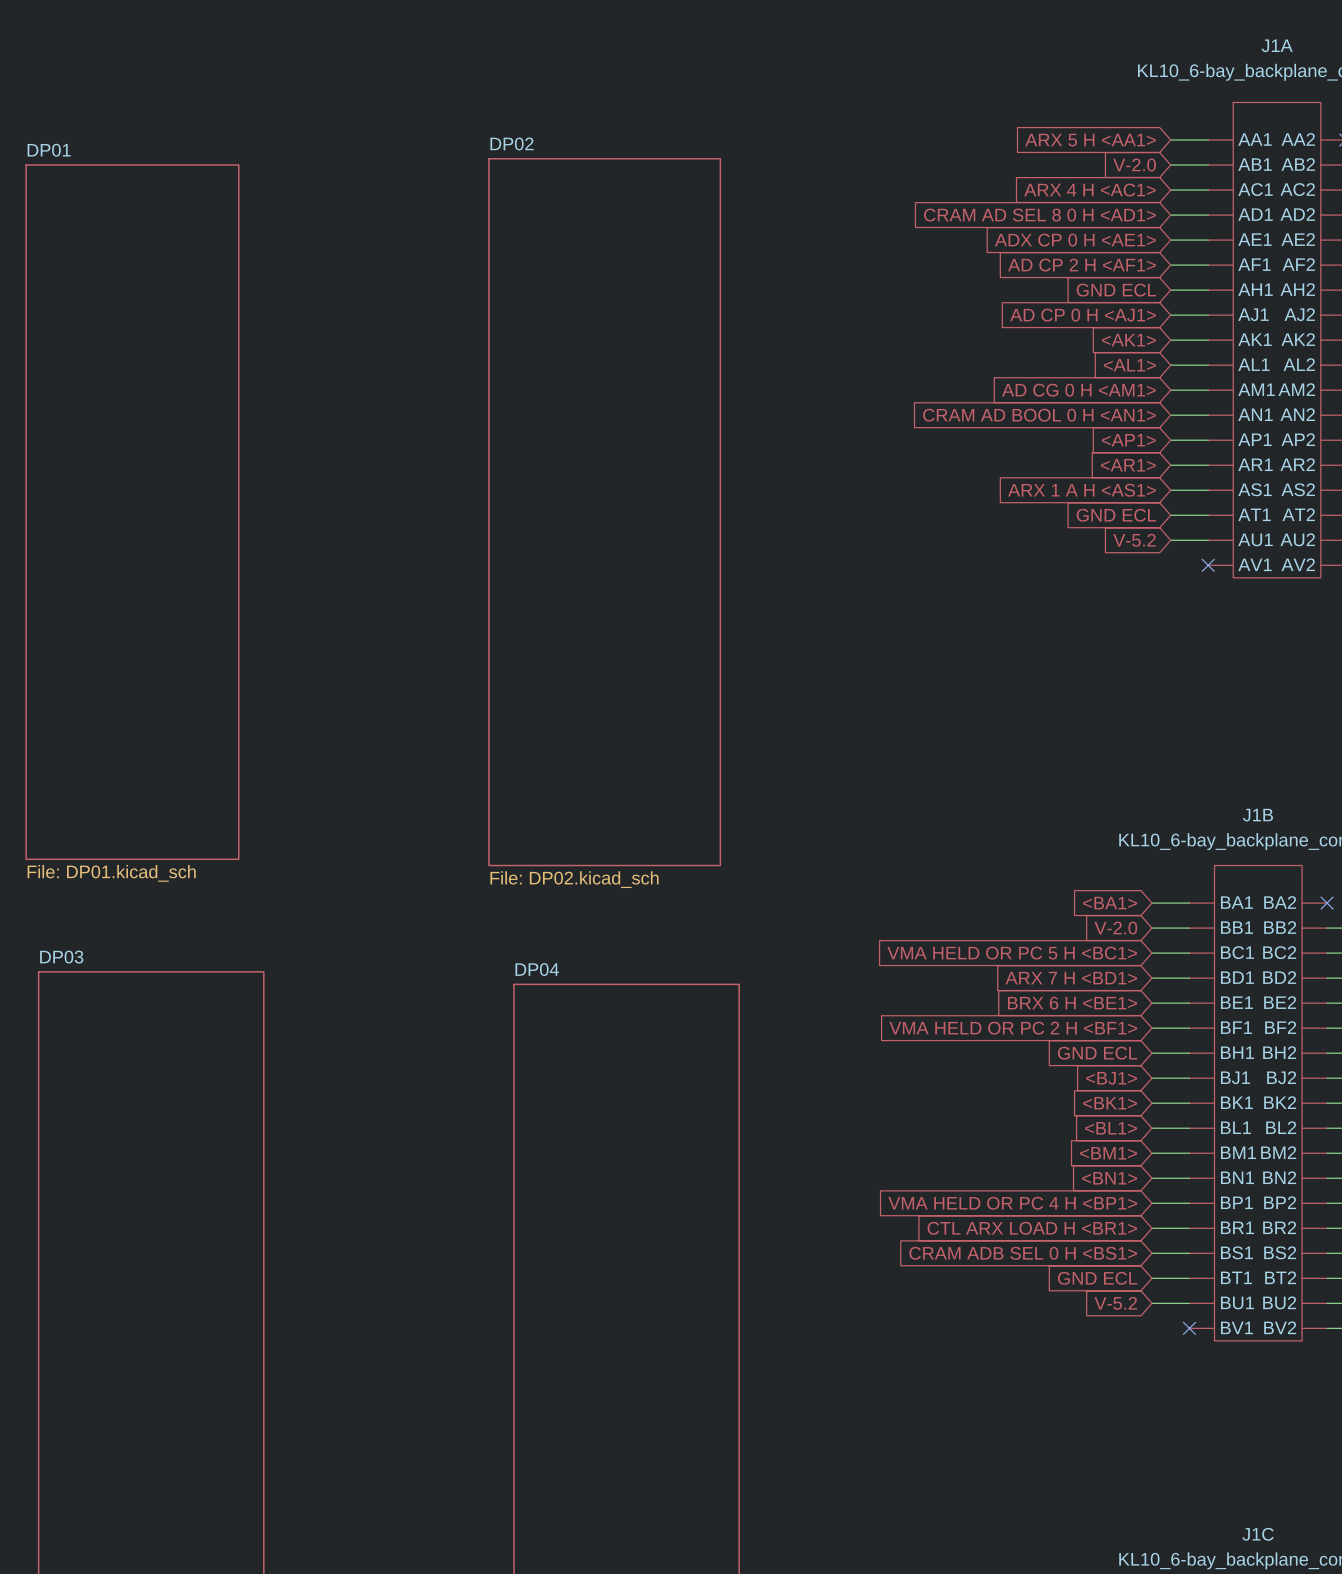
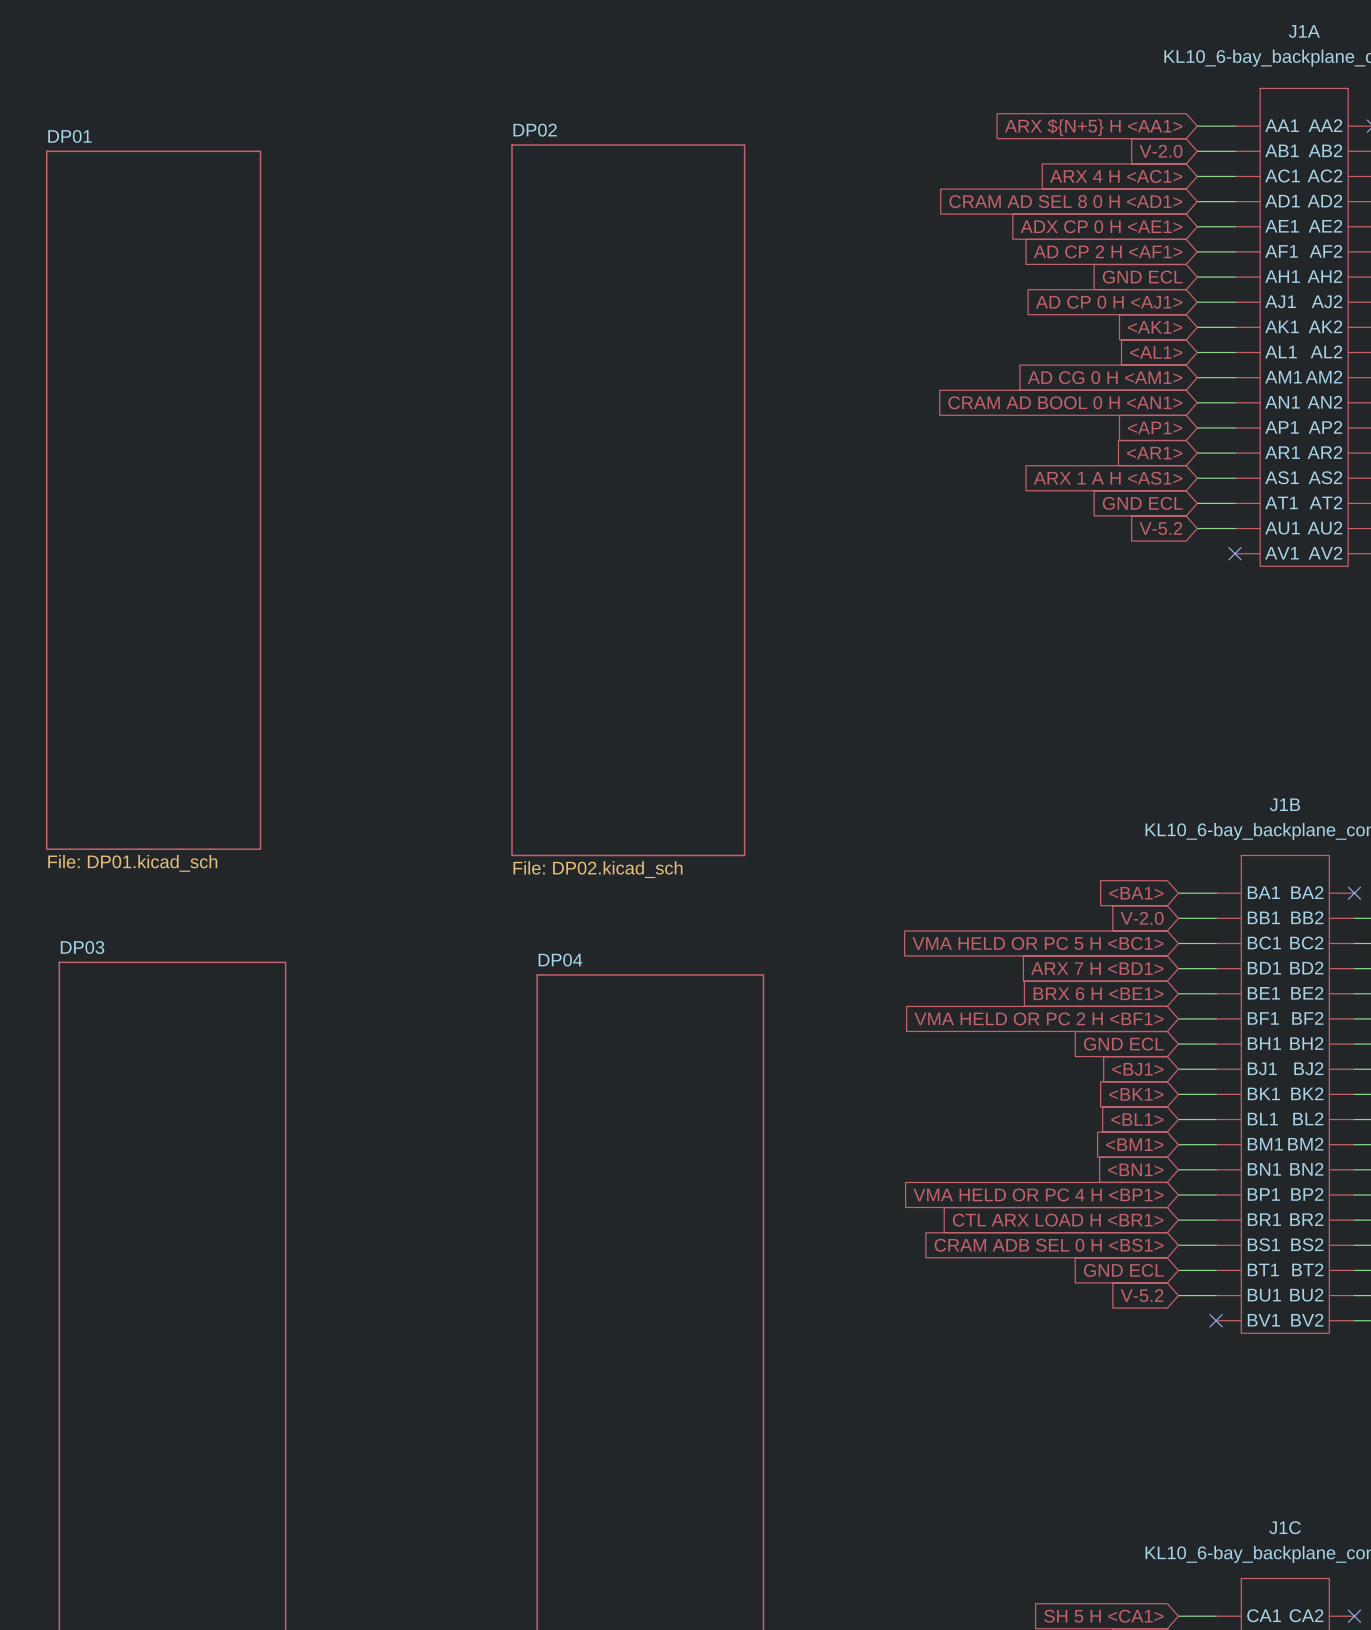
global label: ARX 5 H <AA1> (1090, 140) -> ARX ${N+5} H <AA1> (1093, 127)

